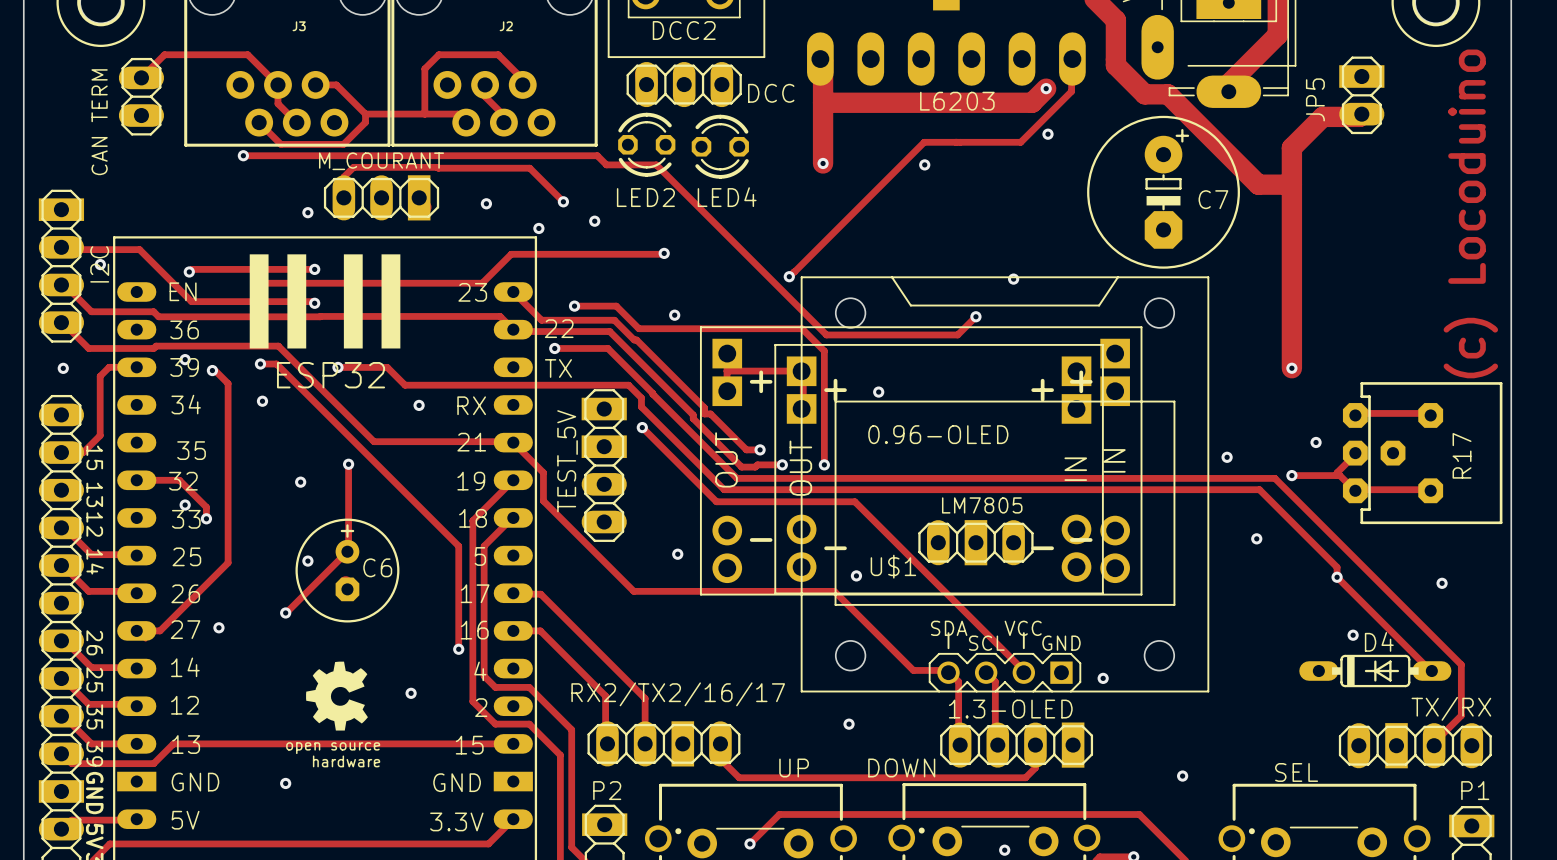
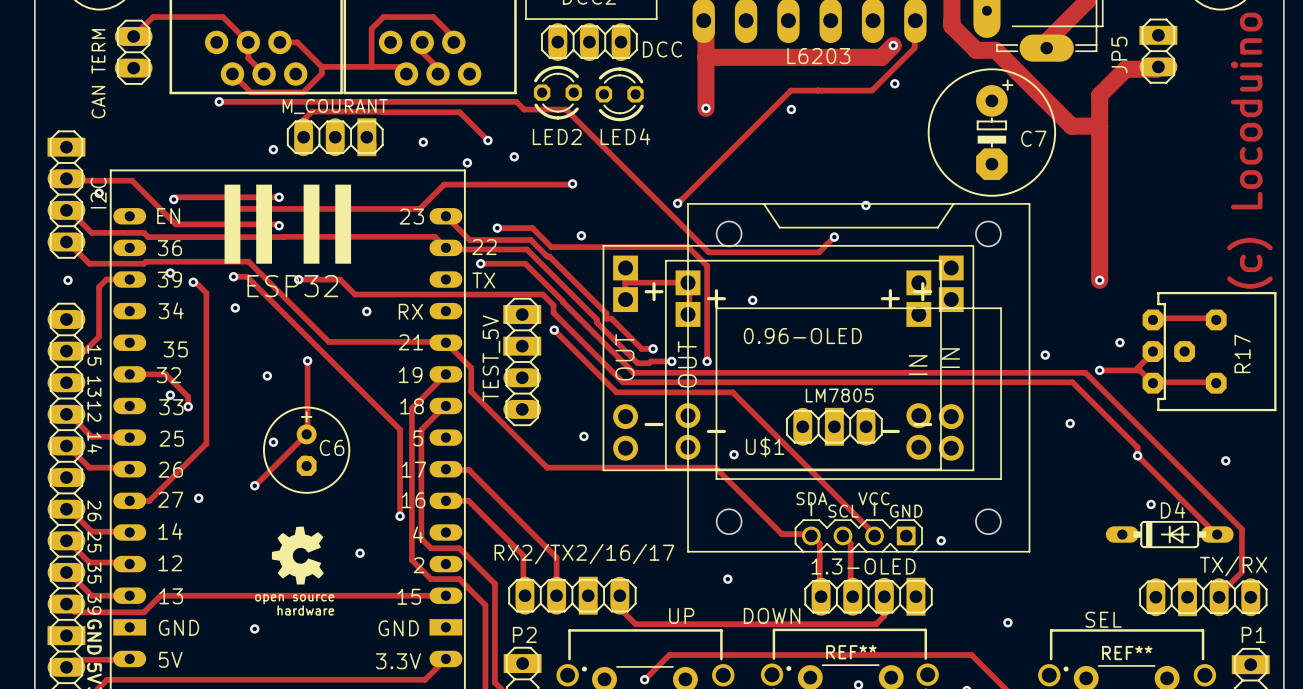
REF** name: none -> REF** (851, 652)
REF** name: none -> REF** (1127, 653)

